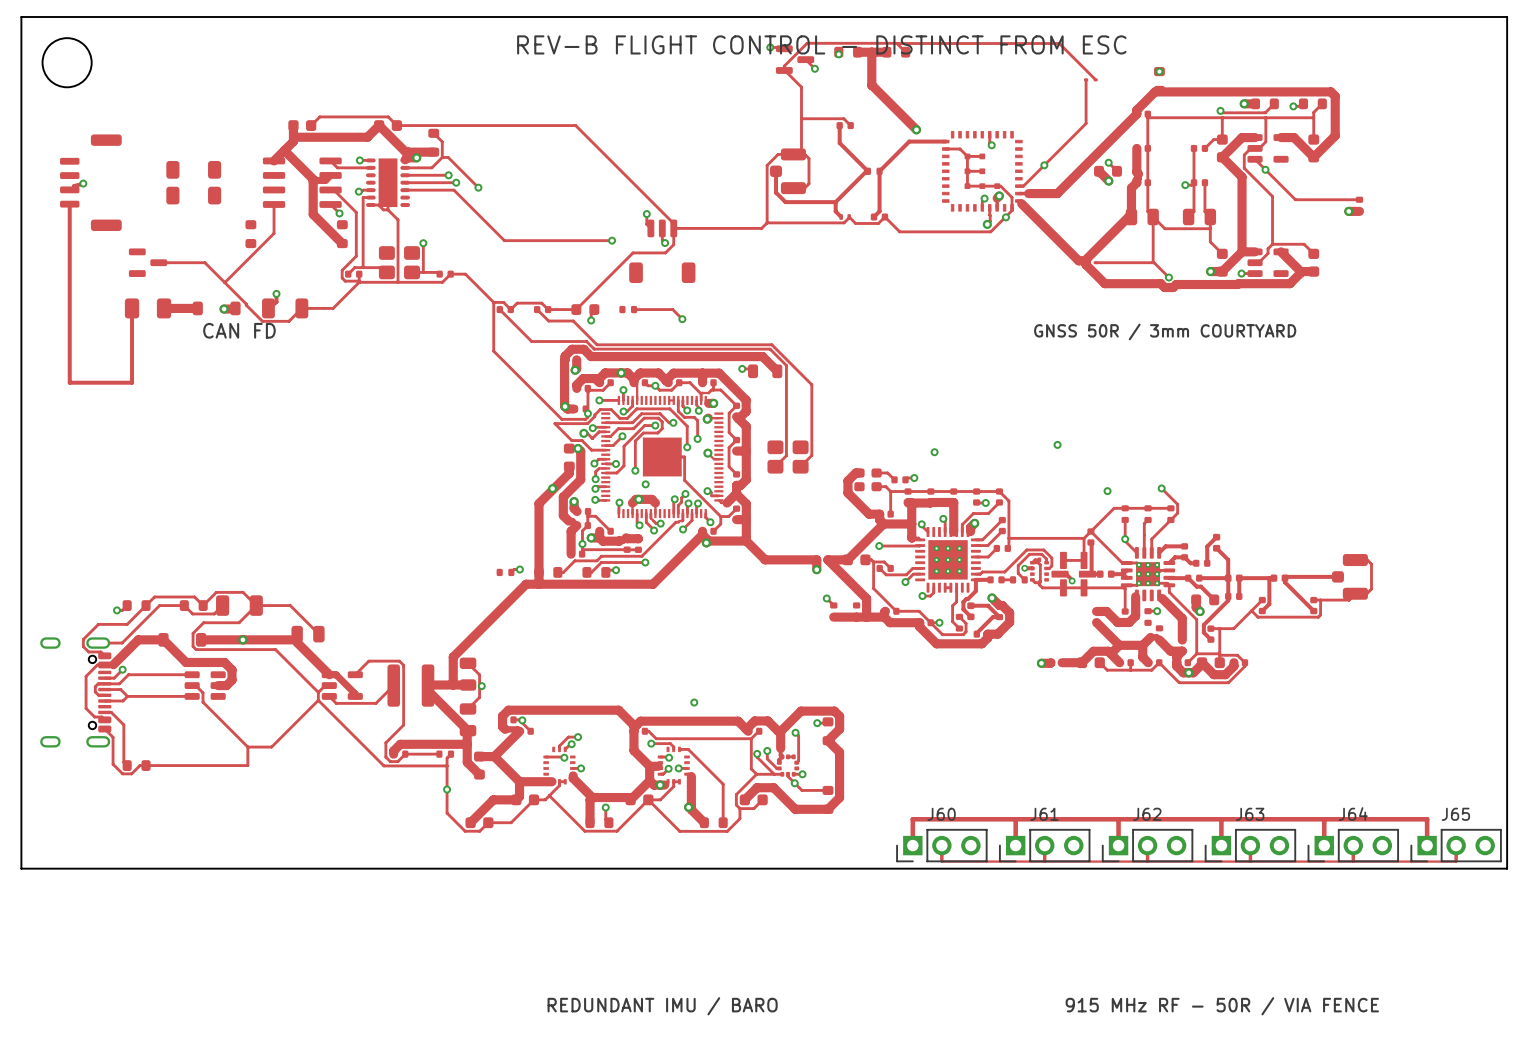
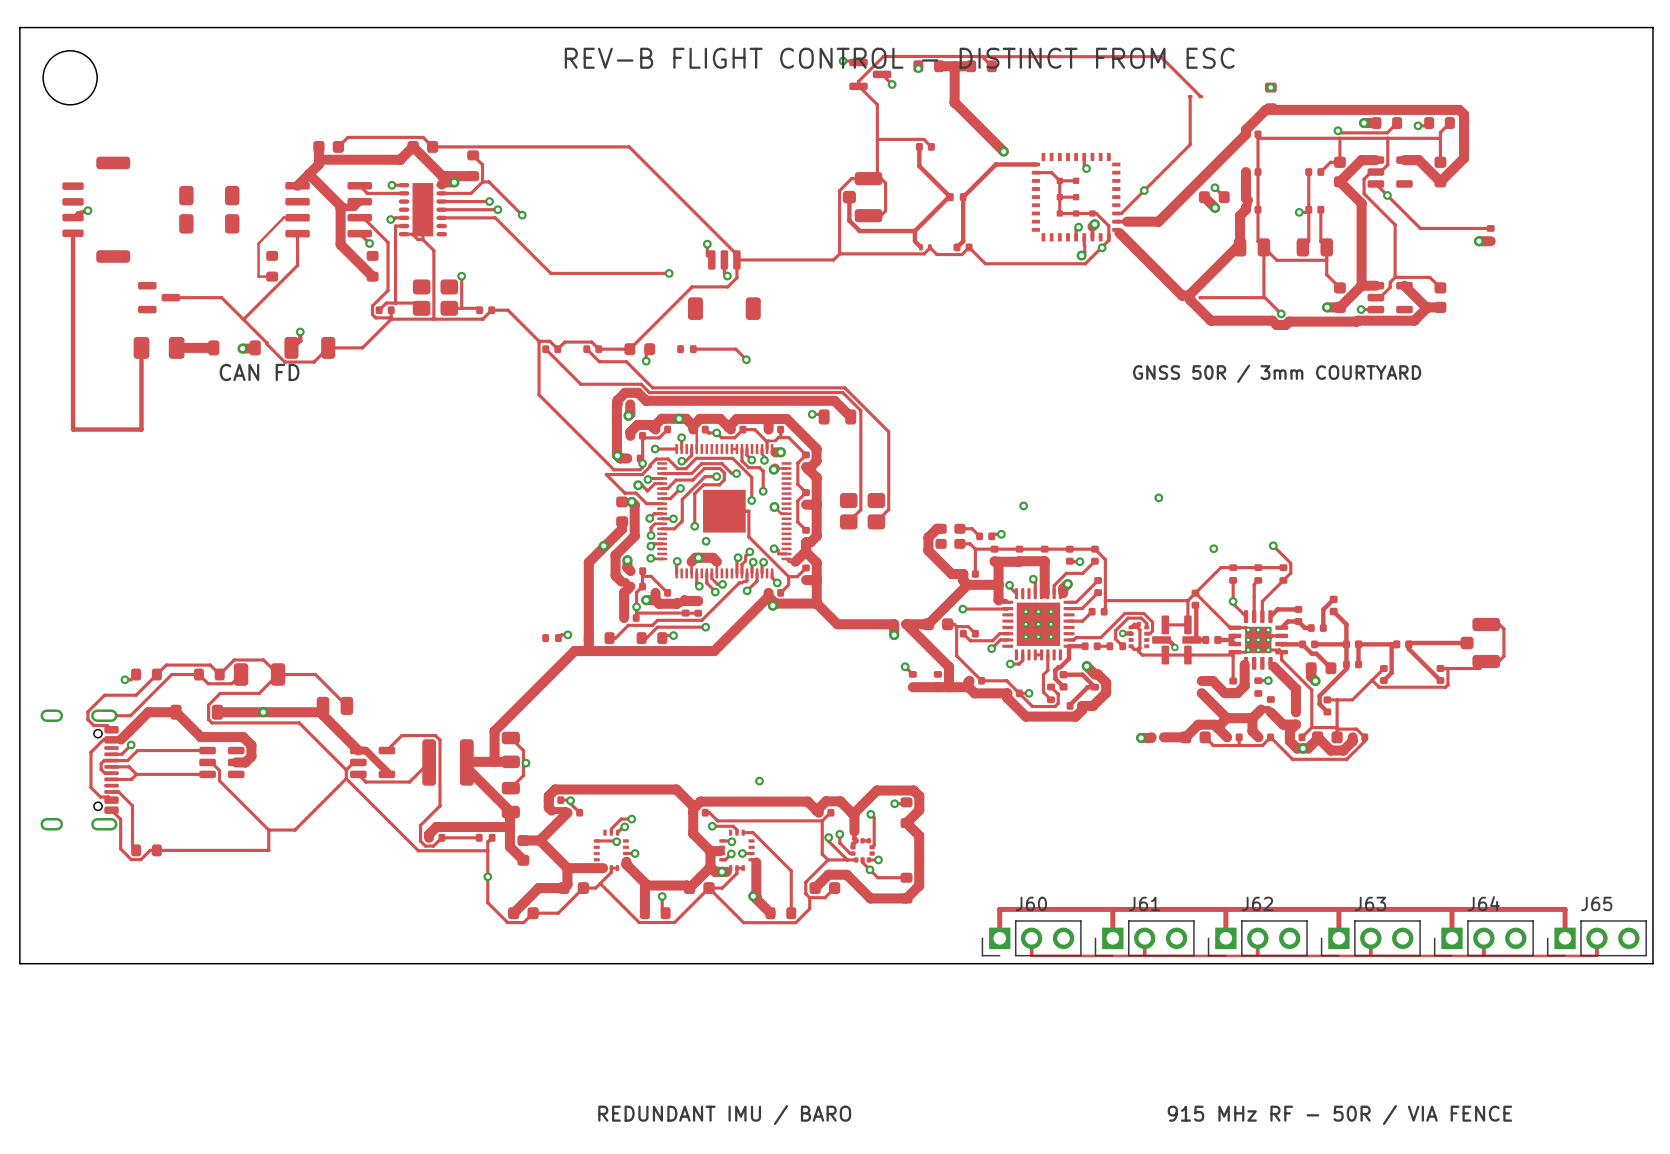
track: none -> (297, 217) (283, 217) (258, 243) (258, 276) (272, 276)

